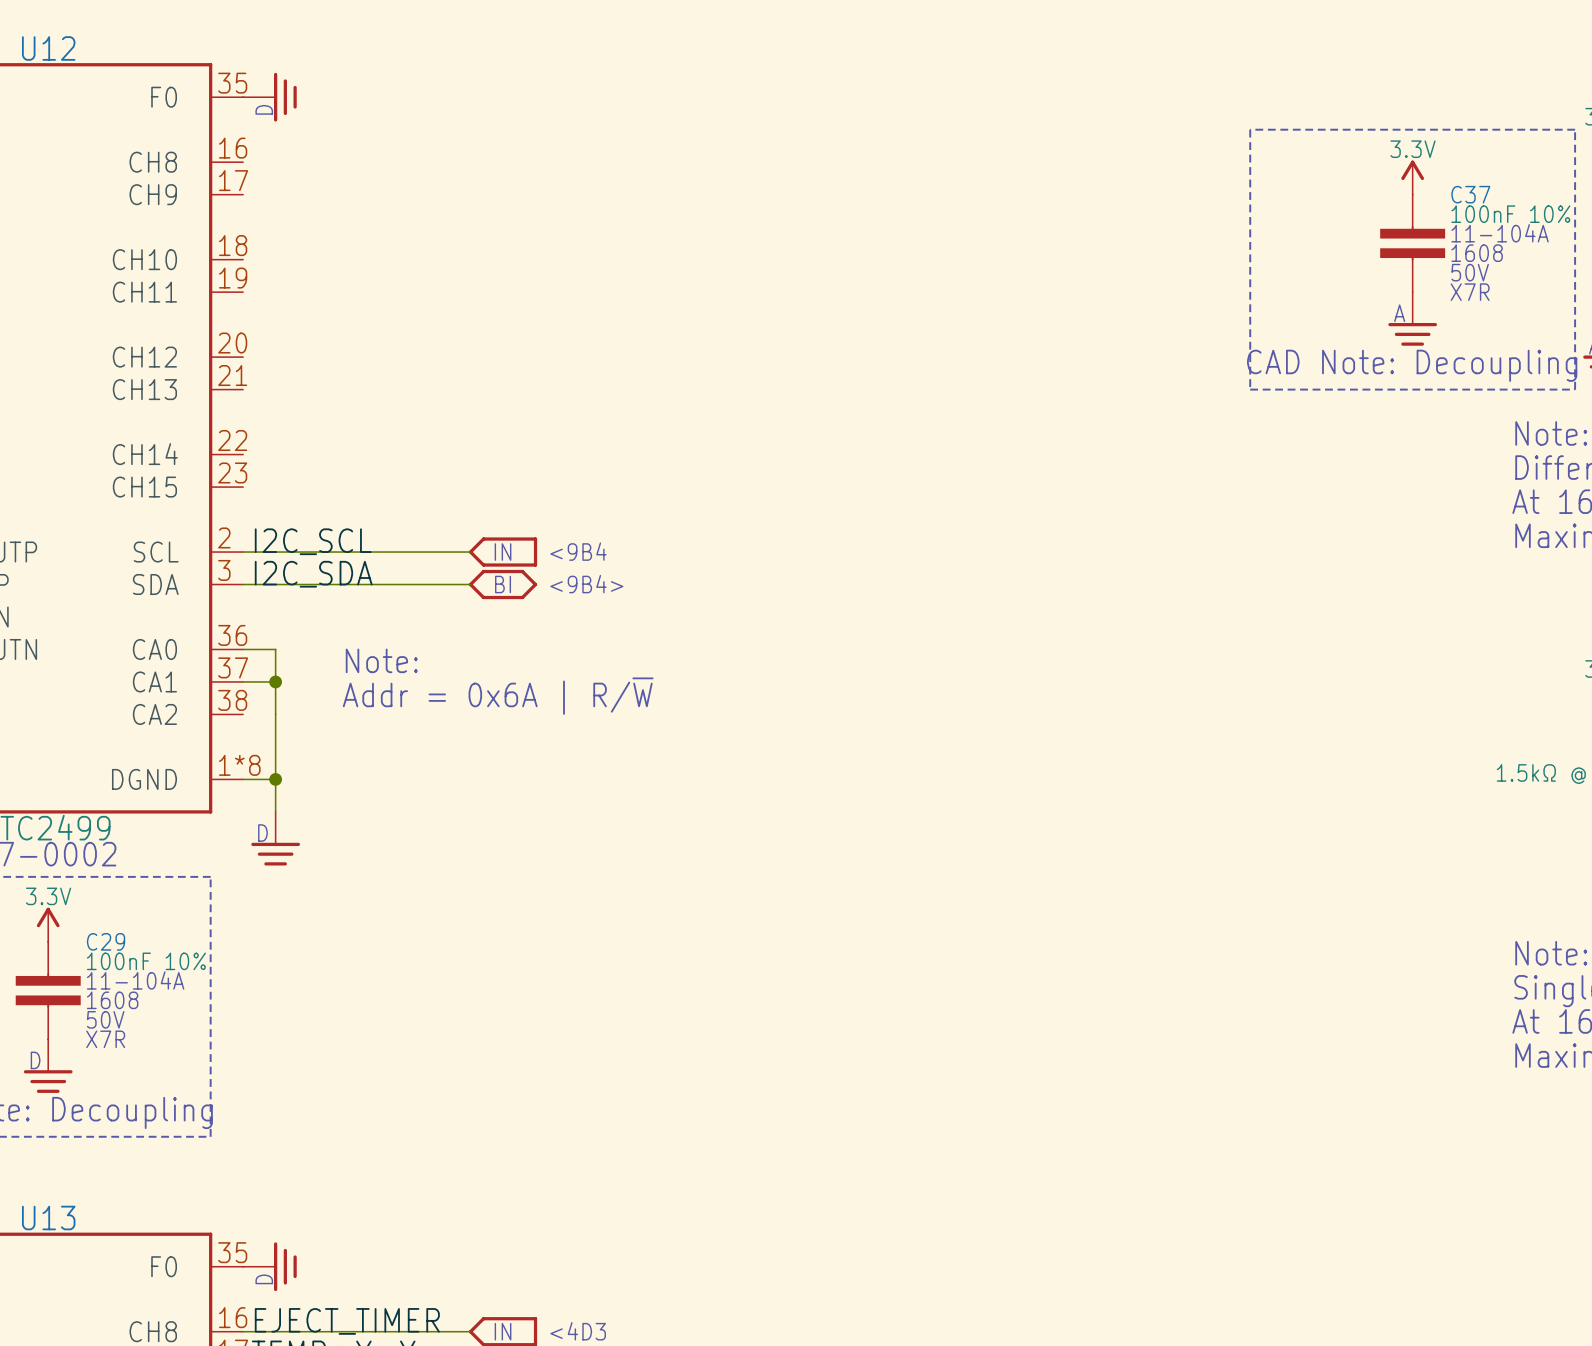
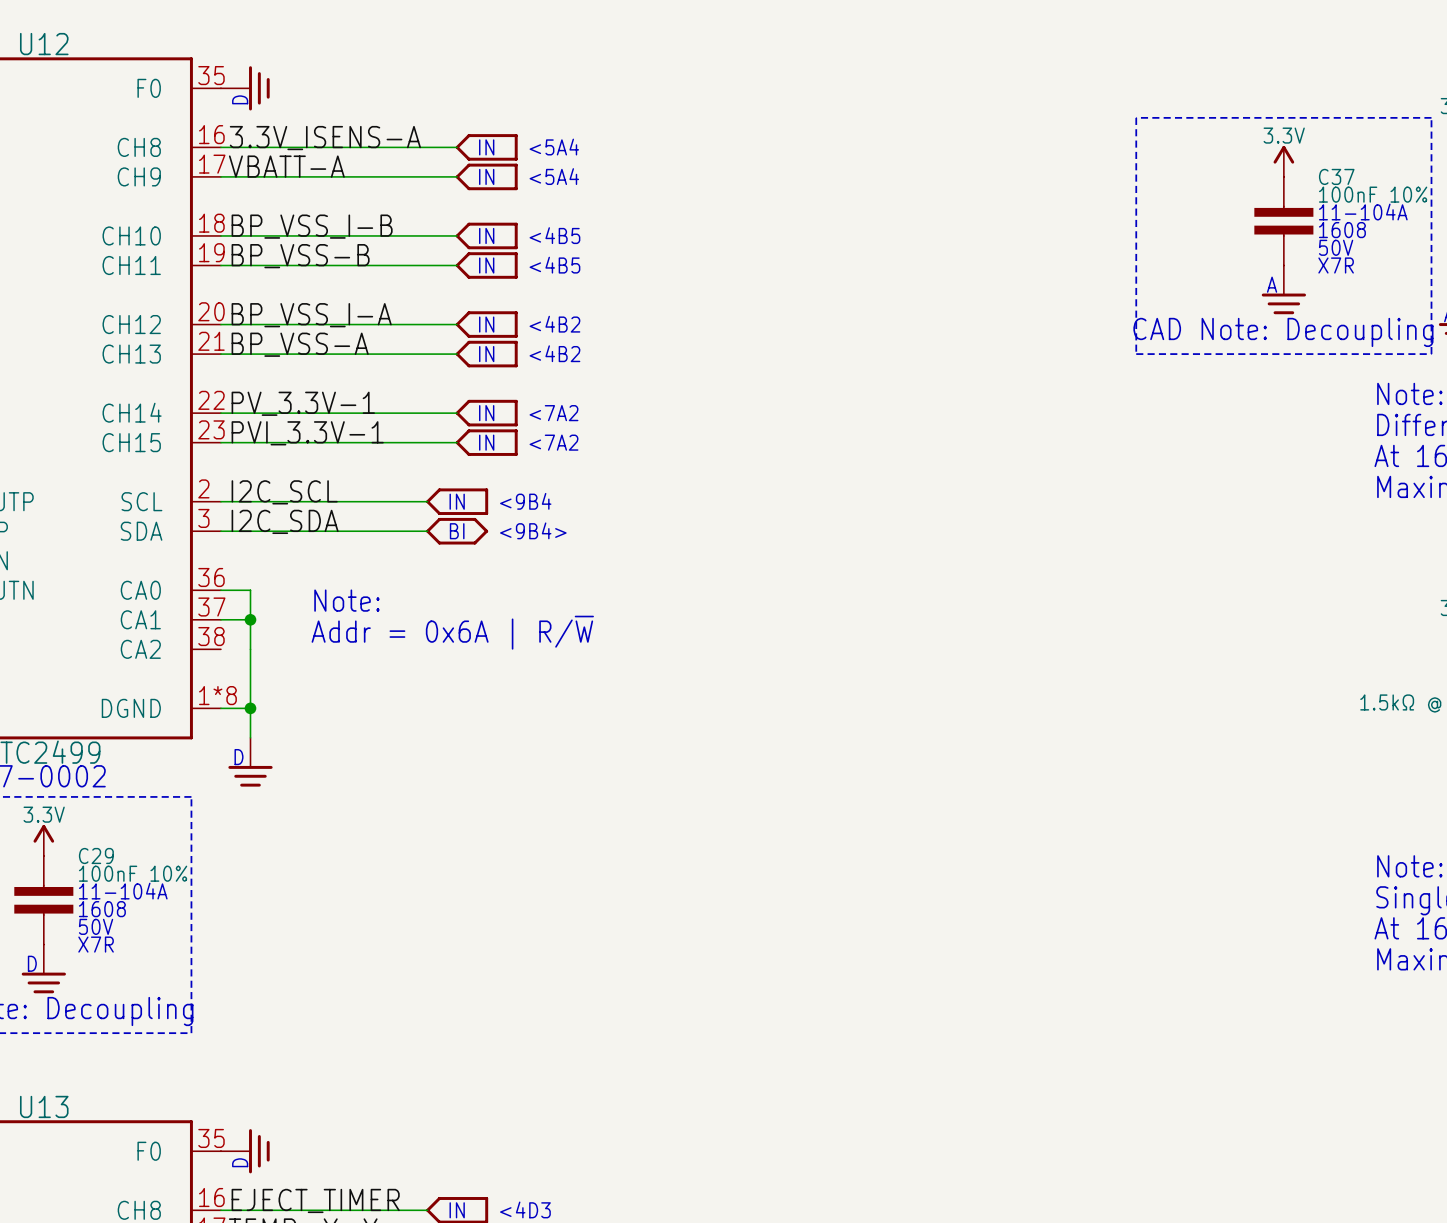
label: none -> 3.3V_ISENS-A (325, 138)
text: none -> <5A4 (554, 147)
wire: none -> (220, 147) (457, 147)
part: none -> (486, 147)
label: none -> VBATT-A (286, 166)
wire: none -> (220, 176) (457, 176)
part: none -> (486, 176)
text: none -> <5A4 (554, 176)
label: none -> BP_VSS_I-B (312, 226)
wire: none -> (220, 235) (457, 235)
part: none -> (486, 235)
text: none -> <4B5 (554, 235)
label: none -> BP_VSS-B (300, 256)
text: none -> <4B5 (554, 265)
wire: none -> (220, 265) (457, 265)
part: none -> (486, 265)
label: none -> BP_VSS_I-A (311, 315)
text: none -> <4B2 (554, 324)
wire: none -> (220, 324) (457, 324)
part: none -> (486, 324)
label: none -> BP_VSS-A (300, 344)
wire: none -> (220, 354) (457, 354)
part: none -> (486, 354)
text: none -> <4B2 (554, 353)
label: none -> PV_3.3V-1 (303, 403)
wire: none -> (220, 413) (457, 413)
part: none -> (486, 413)
text: none -> <7A2 (554, 413)
label: none -> PVI_3.3V-1 (307, 433)
wire: none -> (220, 442) (457, 442)
part: none -> (486, 442)
text: none -> <7A2 (554, 442)

